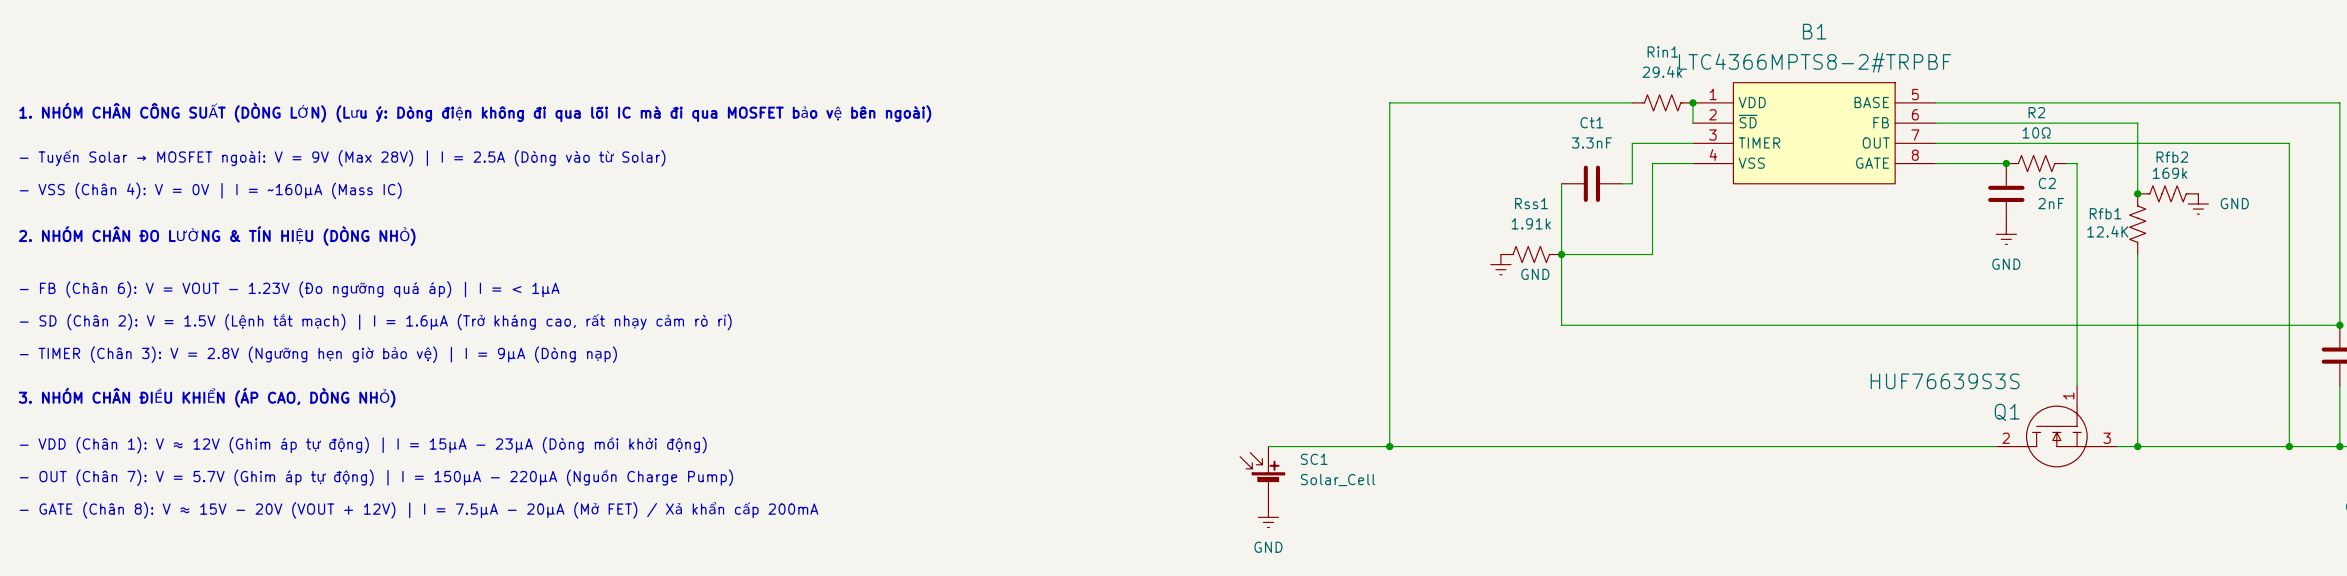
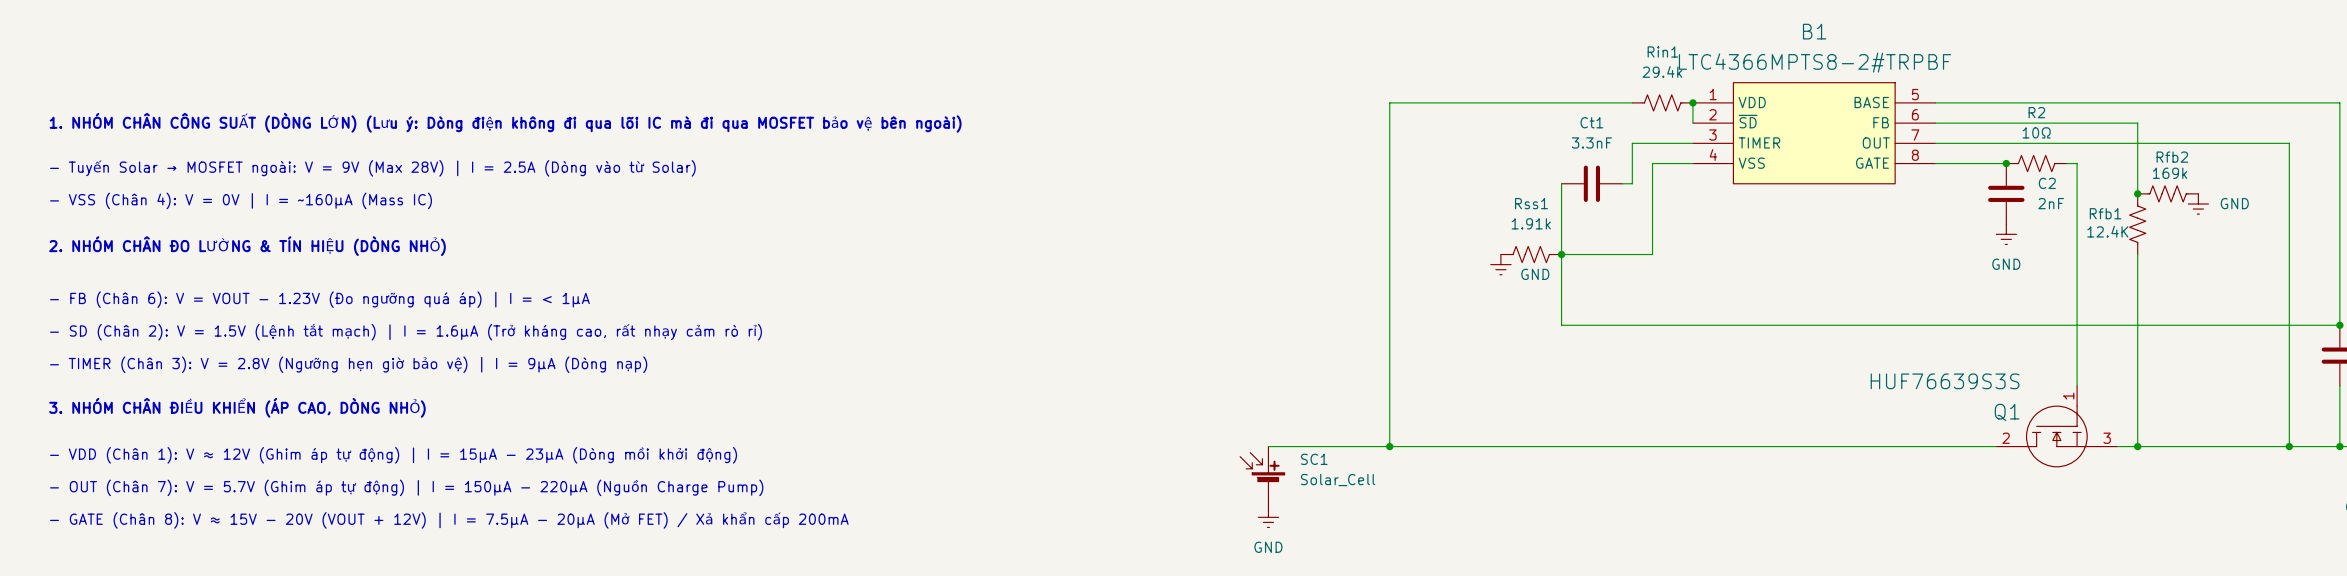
text position: 1. NHÓM CHÂN CÔNG SUẤT (DÒNG LỚN) (Lưu ý: Dòng điện không đi qua lõi IC mà đi qua MOSFET bảo vệ bên ngoài) (475, 112) -> 1. NHÓM CHÂN CÔNG SUẤT (DÒNG LỚN) (Lưu ý: Dòng điện không đi qua lõi IC mà đi qua MOSFET bảo vệ bên ngoài) (505, 122)
text position: - Tuyến Solar → MOSFET ngoài: V = 9V (Max 28V) | I = 2.5A (Dòng vào từ Solar) (342, 158) -> - Tuyến Solar → MOSFET ngoài: V = 9V (Max 28V) | I = 2.5A (Dòng vào từ Solar) (372, 168)
text position: - VSS (Chân 4): V = 0V | I = ~160µA (Mass IC) (210, 190) -> - VSS (Chân 4): V = 0V | I = ~160µA (Mass IC) (241, 200)
text position: 2. NHÓM CHÂN ĐO LƯỜNG & TÍN HIỆU (DÒNG NHỎ) (217, 235) -> 2. NHÓM CHÂN ĐO LƯỜNG & TÍN HIỆU (DÒNG NHỎ) (247, 246)
text position: - FB (Chân 6): V = VOUT - 1.23V (Đo ngưỡng quá áp) | I = < 1µA (289, 289) -> - FB (Chân 6): V = VOUT - 1.23V (Đo ngưỡng quá áp) | I = < 1µA (319, 299)
text position: - SD (Chân 2): V = 1.5V (Lệnh tắt mạch) | I = 1.6µA (Trở kháng cao, rất nhạy cảm rò rỉ) (375, 321) -> - SD (Chân 2): V = 1.5V (Lệnh tắt mạch) | I = 1.6µA (Trở kháng cao, rất nhạy cảm rò rỉ) (406, 331)
text position: - TIMER (Chân 3): V = 2.8V (Ngưỡng hẹn giờ bảo vệ) | I = 9µA (Dòng nạp) (318, 354) -> - TIMER (Chân 3): V = 2.8V (Ngưỡng hẹn giờ bảo vệ) | I = 9µA (Dòng nạp) (348, 364)
text position: 3. NHÓM CHÂN ĐIỀU KHIỂN (ÁP CAO, DÒNG NHỎ) (207, 397) -> 3. NHÓM CHÂN ĐIỀU KHIỂN (ÁP CAO, DÒNG NHỎ) (237, 407)
text position: - VDD (Chân 1): V ≈ 12V (Ghim áp tự động) | I = 15µA - 23µA (Dòng mồi khởi động) (363, 445) -> - VDD (Chân 1): V ≈ 12V (Ghim áp tự động) | I = 15µA - 23µA (Dòng mồi khởi động) (393, 455)
text position: - OUT (Chân 7): V = 5.7V (Ghim áp tự động) | I = 150µA - 220µA (Nguồn Charge Pump) (376, 477) -> - OUT (Chân 7): V = 5.7V (Ghim áp tự động) | I = 150µA - 220µA (Nguồn Charge Pump) (406, 487)
text position: - GATE (Chân 8): V ≈ 15V - 20V (VOUT + 12V) | I = 7.5µA - 20µA (Mở FET) / Xả khẩn cấp 200mA (419, 510) -> - GATE (Chân 8): V ≈ 15V - 20V (VOUT + 12V) | I = 7.5µA - 20µA (Mở FET) / Xả khẩn cấp 200mA (449, 520)

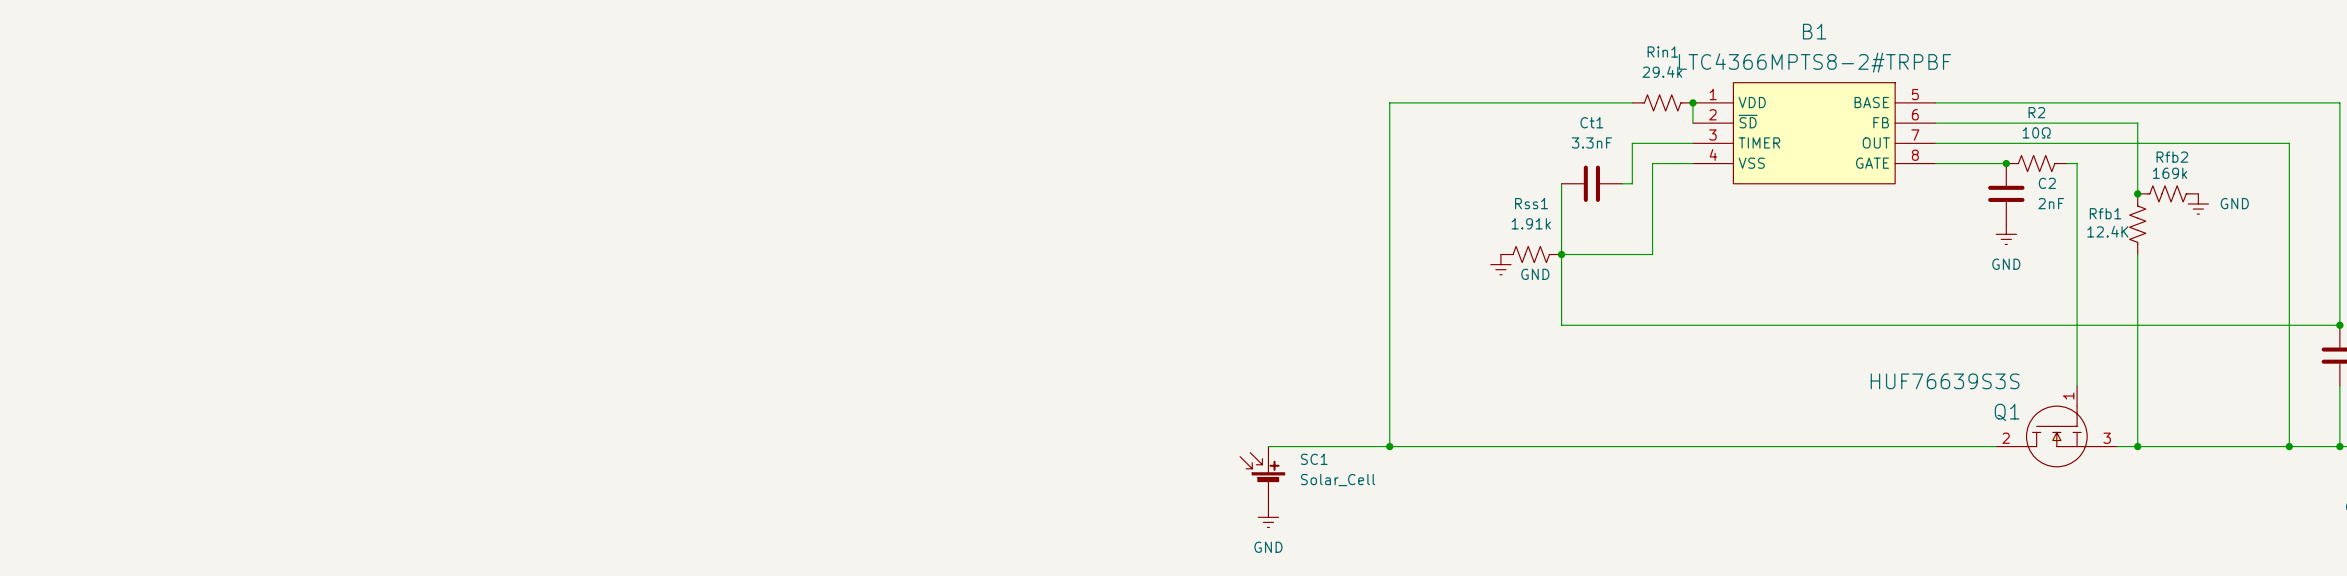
text: 1. NHÓM CHÂN CÔNG SUẤT (DÒNG LỚN) (Lưu ý: Dòng điện không đi qua lõi IC mà đi qua MOSFET bảo vệ bên ngoài) (505, 122) -> none
text: - Tuyến Solar → MOSFET ngoài: V = 9V (Max 28V) | I = 2.5A (Dòng vào từ Solar) (372, 168) -> none
text: - VSS (Chân 4): V = 0V | I = ~160µA (Mass IC) (241, 200) -> none
text: 2. NHÓM CHÂN ĐO LƯỜNG & TÍN HIỆU (DÒNG NHỎ) (247, 246) -> none
text: - FB (Chân 6): V = VOUT - 1.23V (Đo ngưỡng quá áp) | I = < 1µA (319, 299) -> none
text: - SD (Chân 2): V = 1.5V (Lệnh tắt mạch) | I = 1.6µA (Trở kháng cao, rất nhạy cảm rò rỉ) (406, 331) -> none
text: - TIMER (Chân 3): V = 2.8V (Ngưỡng hẹn giờ bảo vệ) | I = 9µA (Dòng nạp) (348, 364) -> none
text: 3. NHÓM CHÂN ĐIỀU KHIỂN (ÁP CAO, DÒNG NHỎ) (237, 407) -> none
text: - VDD (Chân 1): V ≈ 12V (Ghim áp tự động) | I = 15µA - 23µA (Dòng mồi khởi động) (393, 455) -> none
text: - OUT (Chân 7): V = 5.7V (Ghim áp tự động) | I = 150µA - 220µA (Nguồn Charge Pump) (406, 487) -> none
text: - GATE (Chân 8): V ≈ 15V - 20V (VOUT + 12V) | I = 7.5µA - 20µA (Mở FET) / Xả khẩn cấp 200mA (449, 520) -> none

